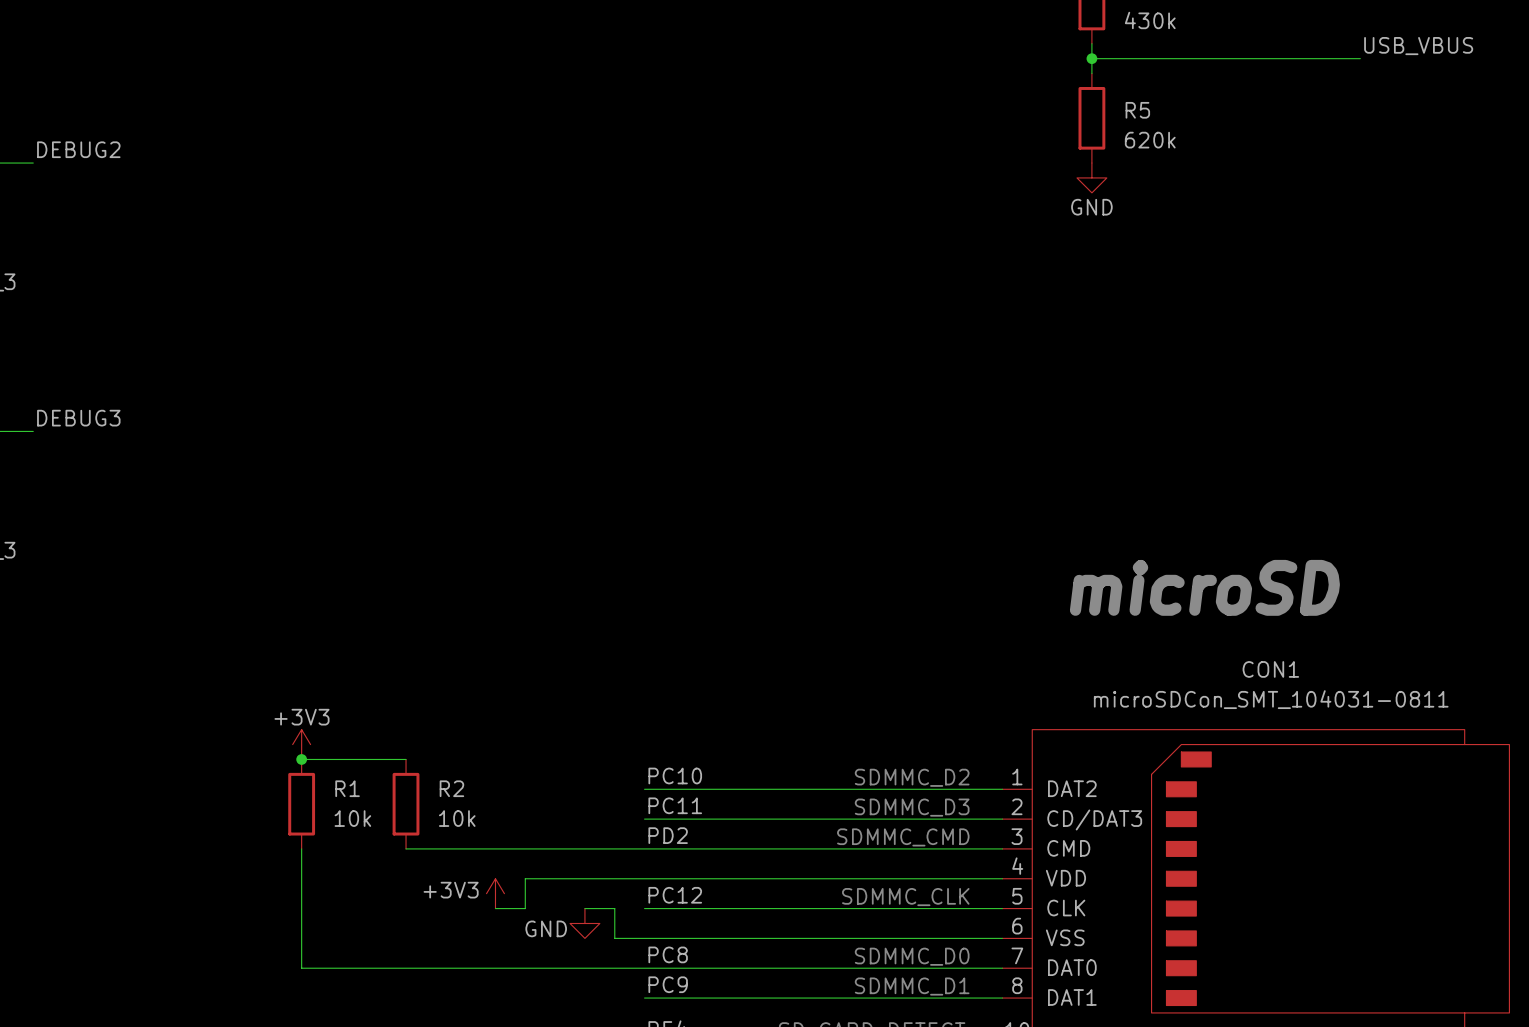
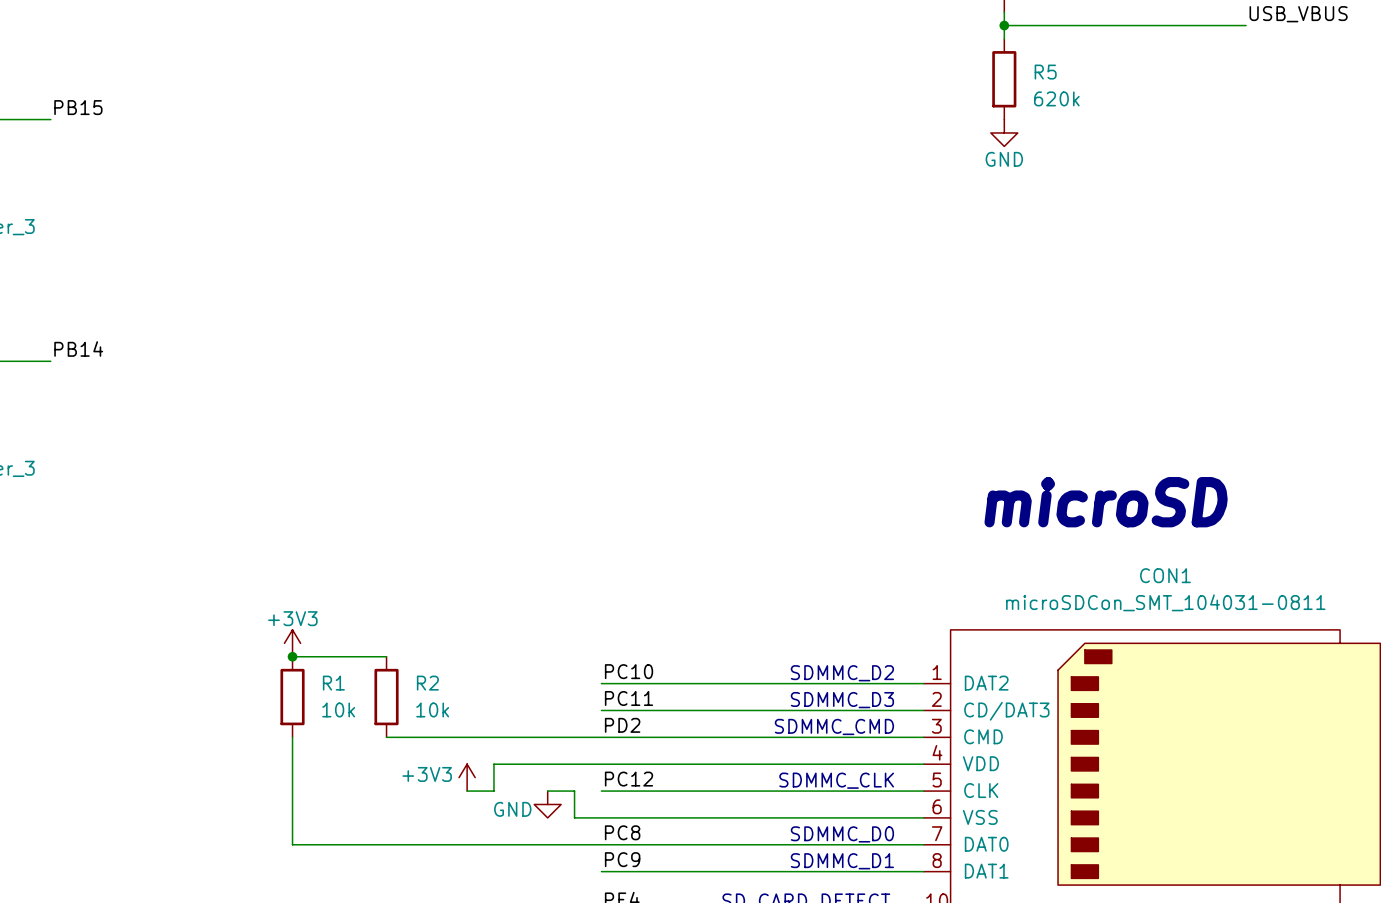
label: DEBUG2 (78, 149) -> PB15 (78, 107)
label: DEBUG3 (78, 418) -> PB14 (78, 349)

